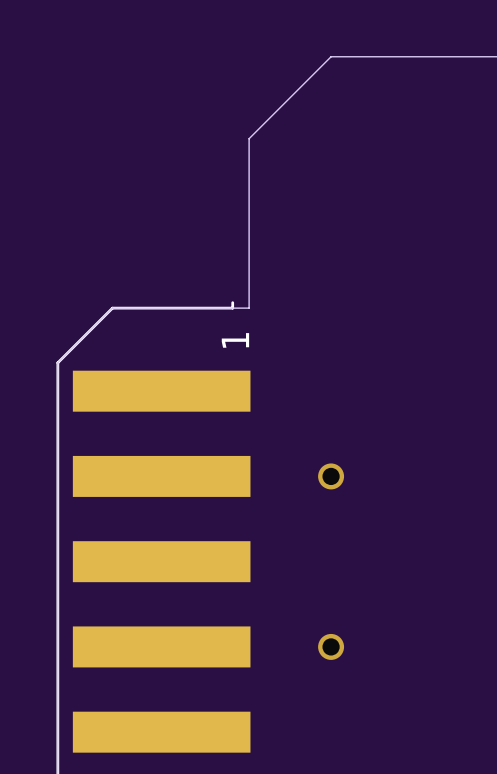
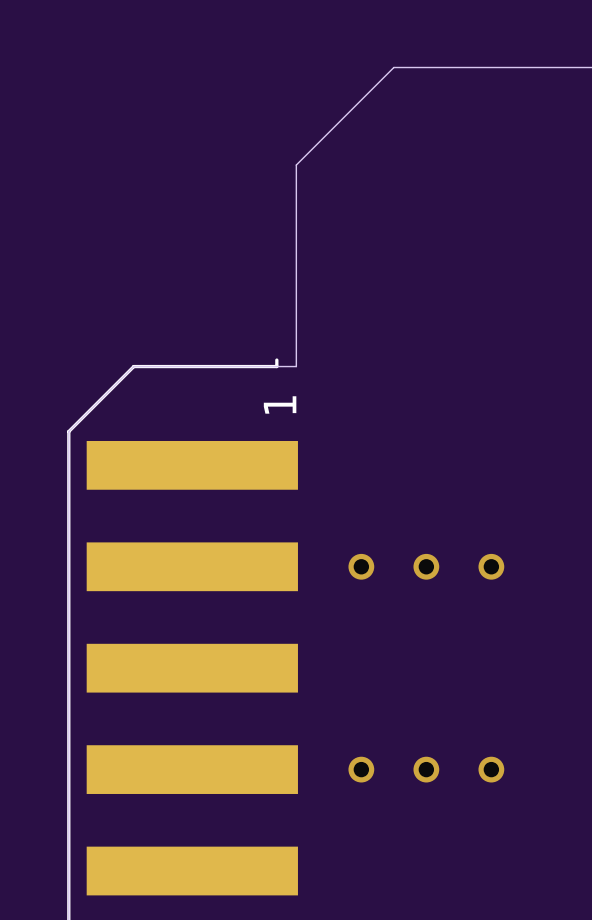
via: none -> (361, 566)
via: (331, 476) -> none
via: none -> (426, 566)
via: none -> (491, 566)
via: none -> (361, 769)
via: (331, 646) -> none
via: none -> (426, 769)
via: none -> (491, 769)

